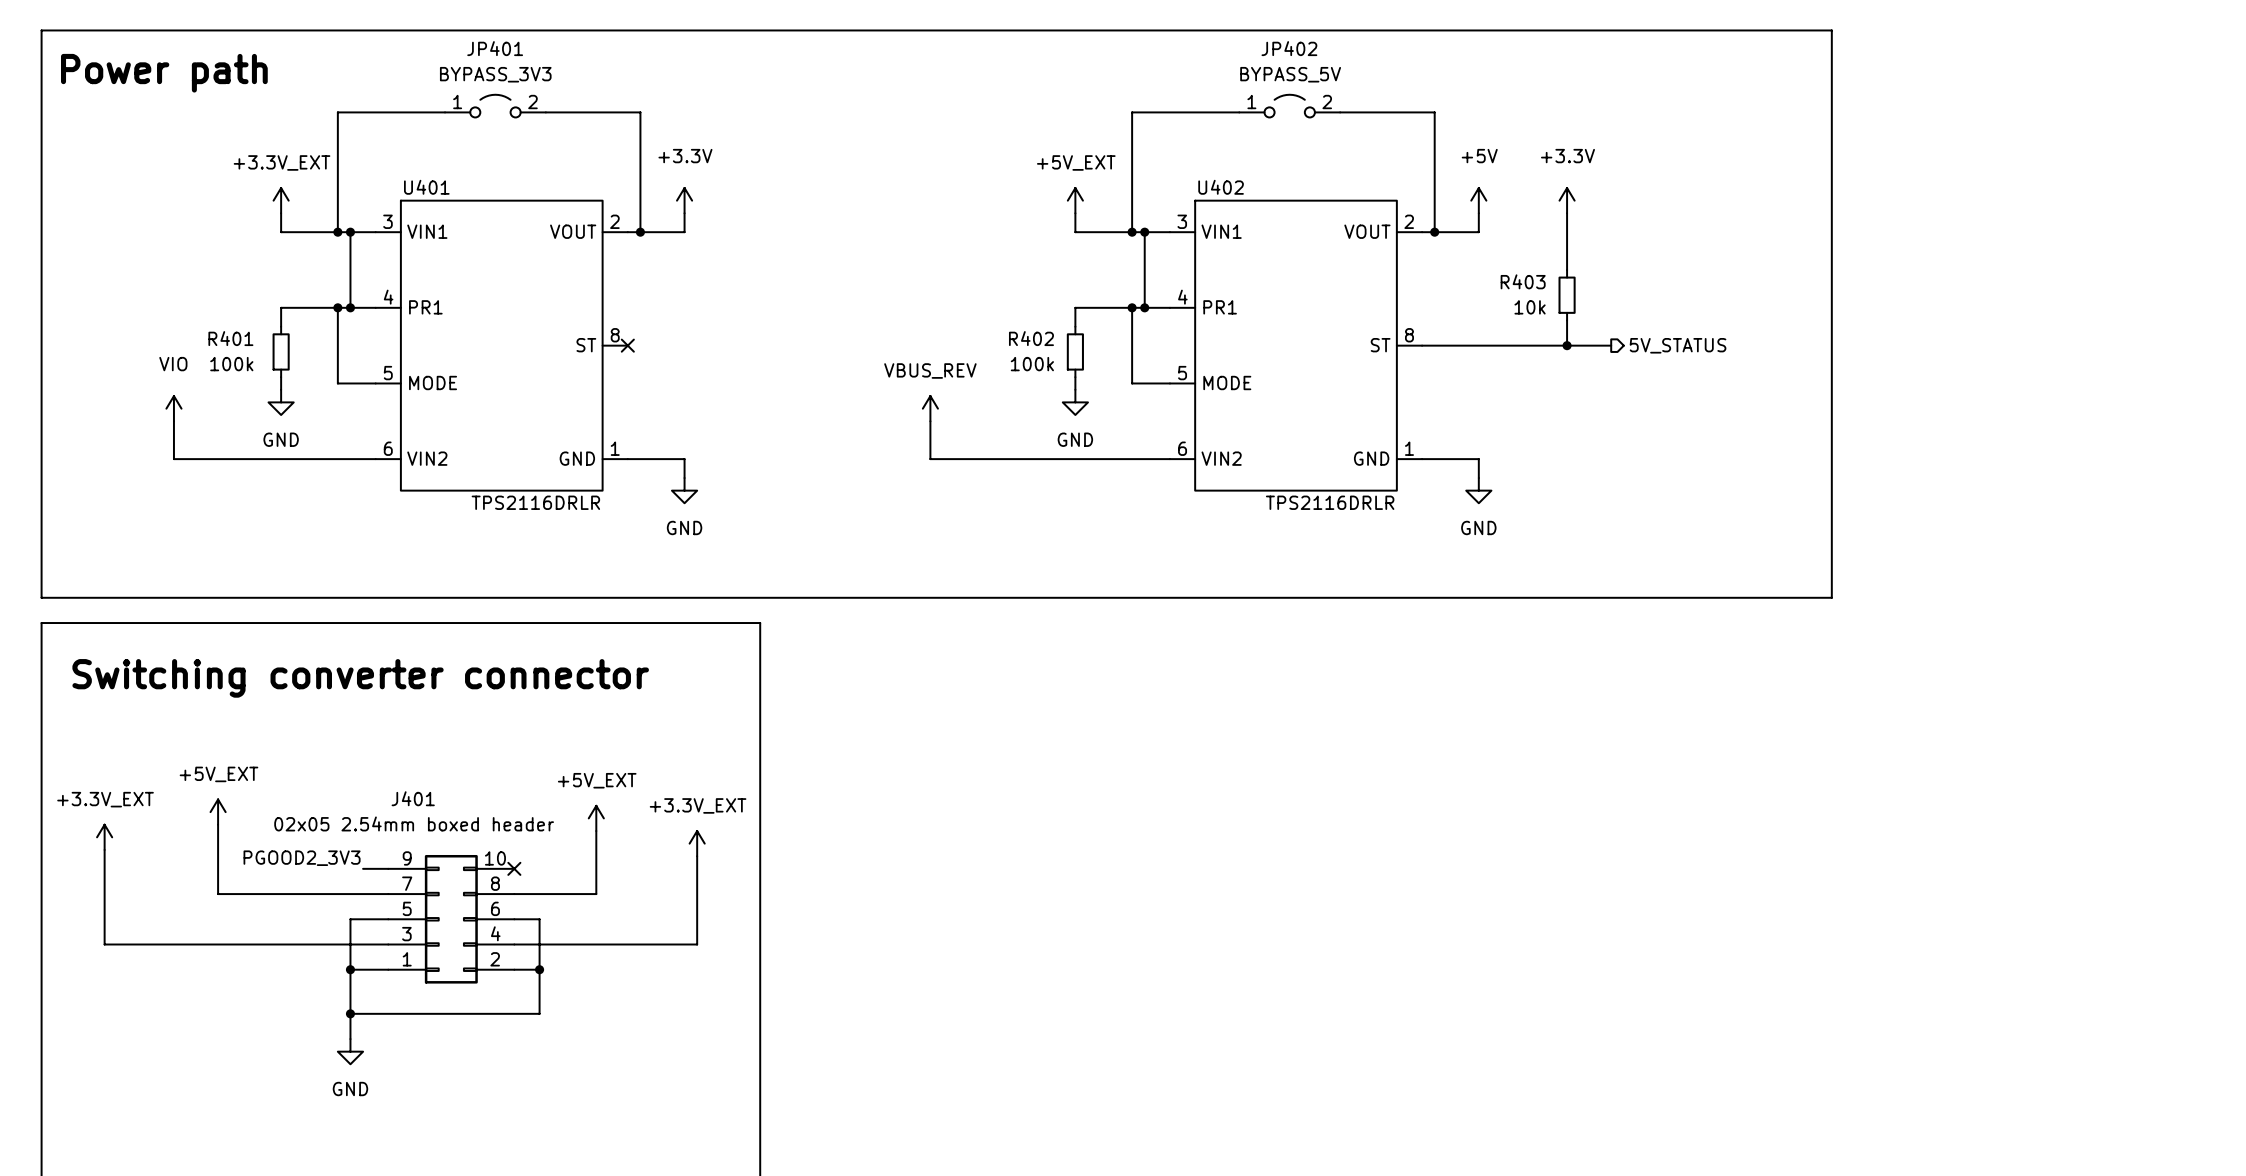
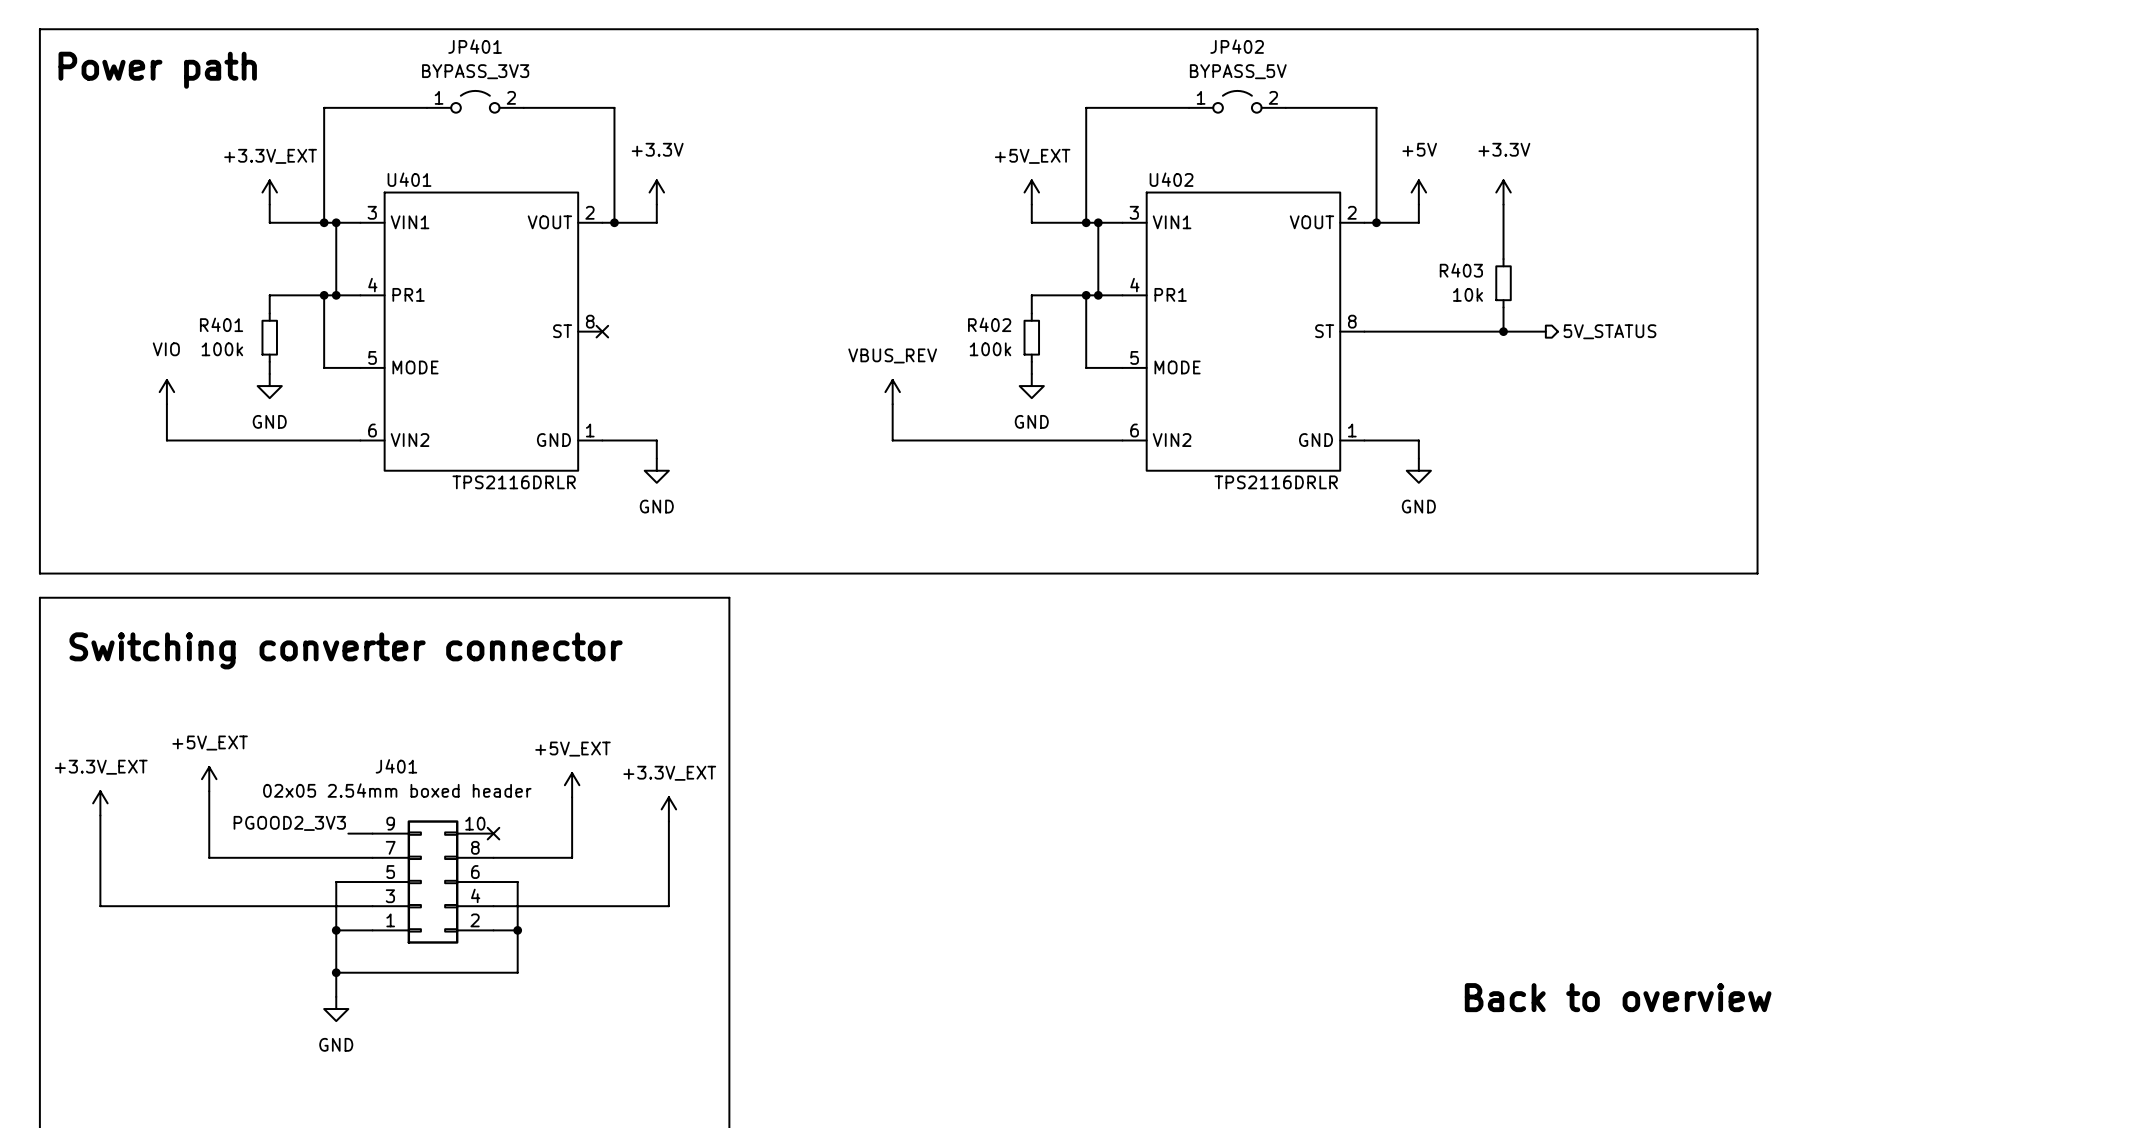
text: none -> Back to overview (1618, 997)

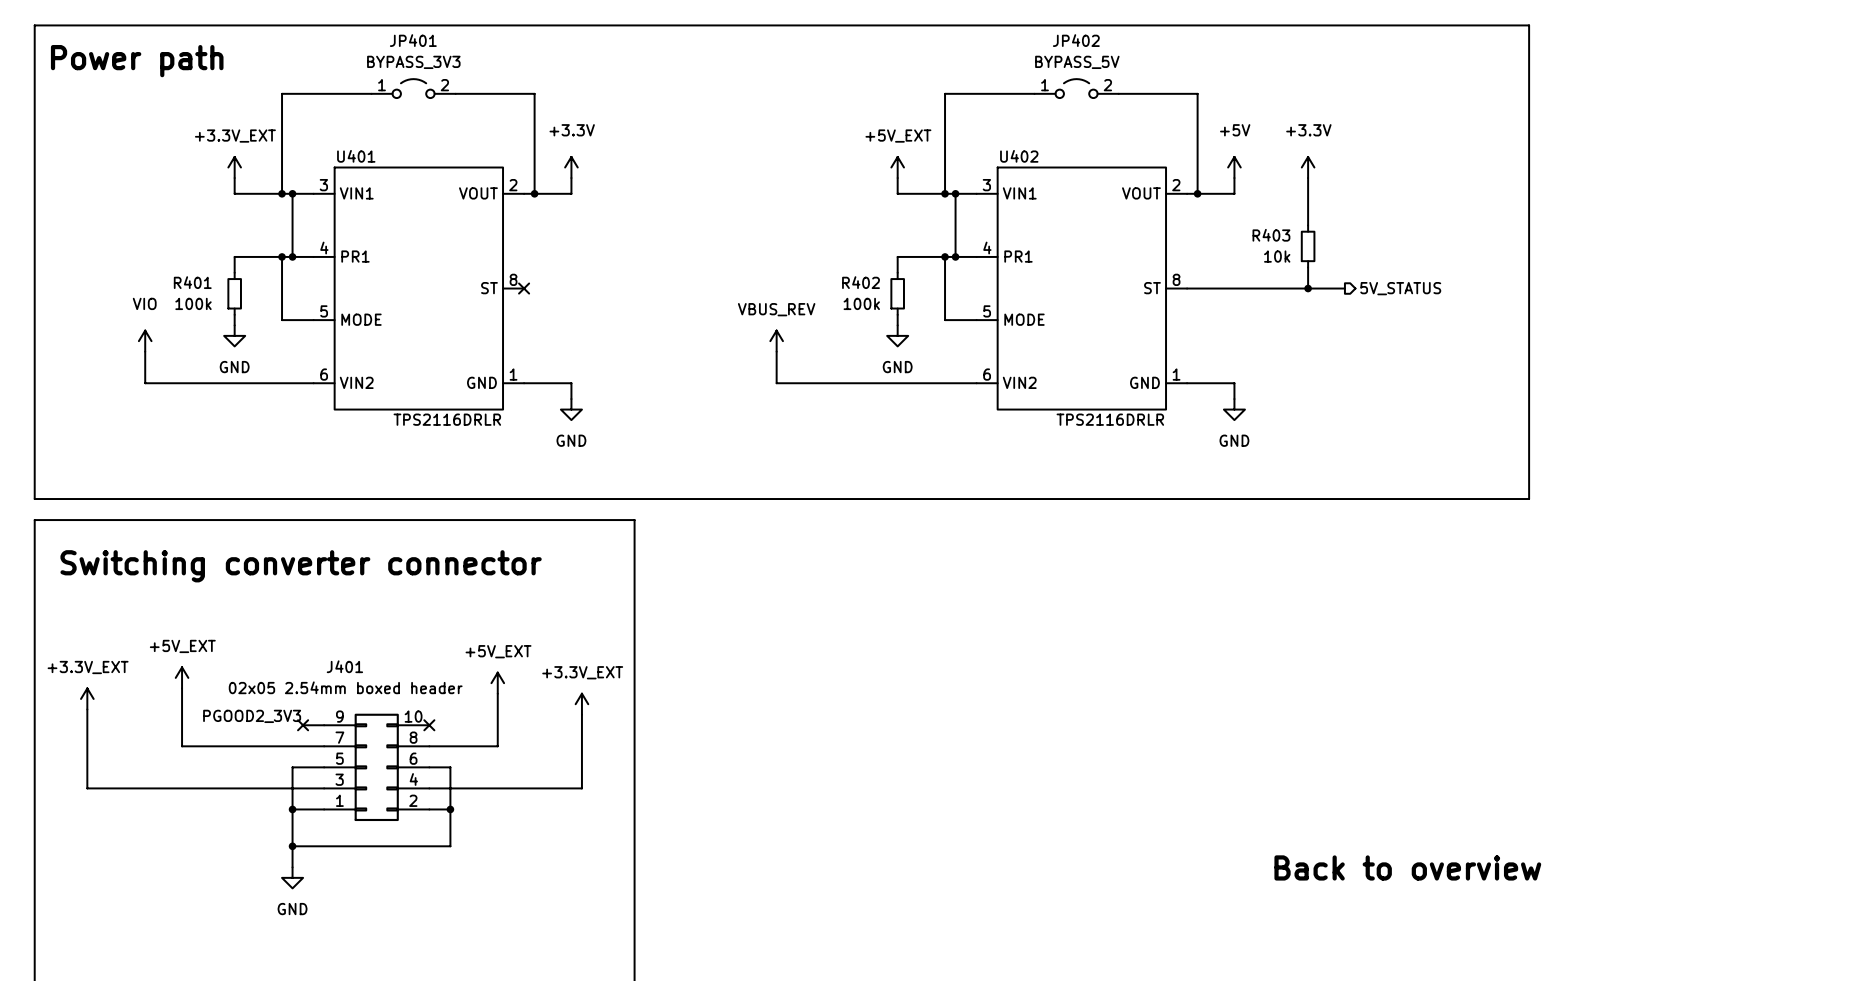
no-connect mark: none -> (303, 725)

